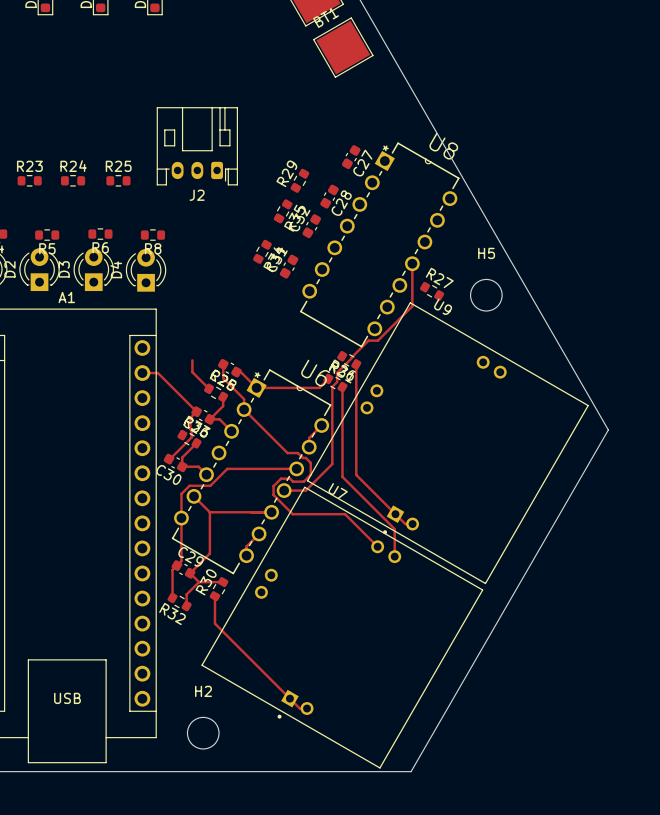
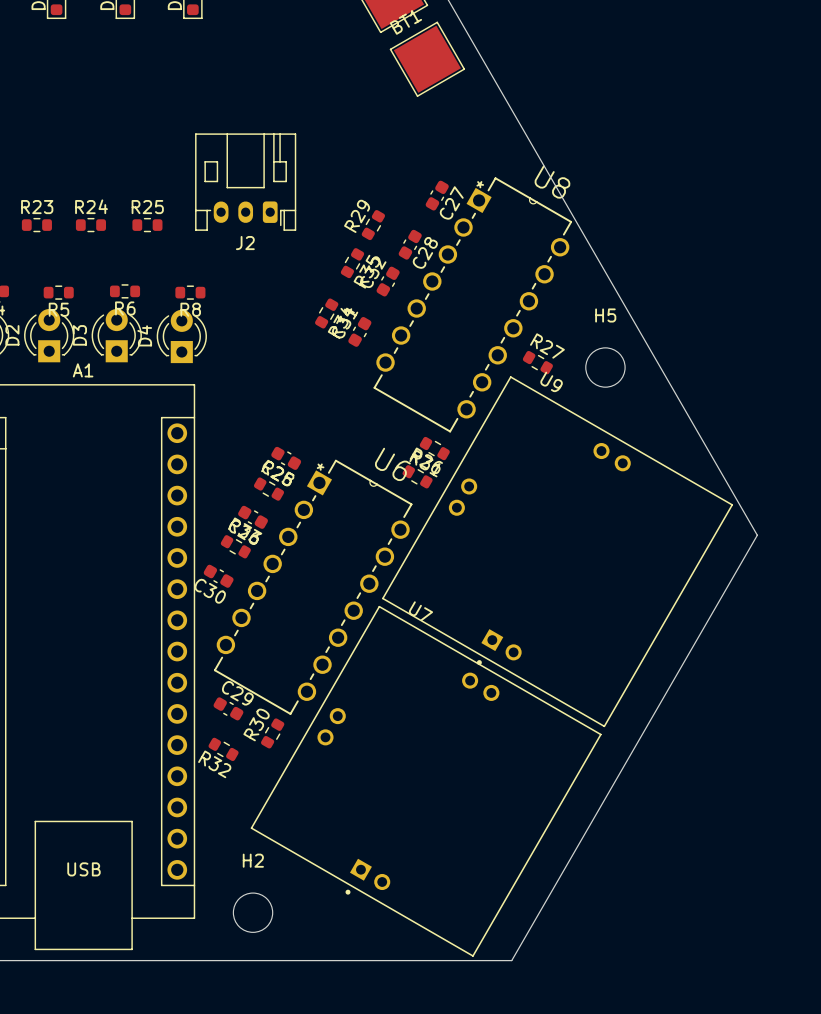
track: (412, 263) (412, 306) (377, 340) (368, 340) (337, 372) (337, 382) (332, 386) (332, 464) (305, 490) (284, 490) -> none
track: (192, 360) (192, 372) (209, 388) -> none
track: (223, 364) (223, 378) (244, 399) (244, 409) (287, 453) (297, 453) (310, 462) (310, 474) (303, 481) (281, 478) (273, 486) (273, 494) (292, 514) (345, 514) (377, 546) -> none
track: (356, 364) (356, 474) (405, 524) (412, 524) -> none
track: (236, 372) (240, 372) (256, 387) (319, 387) (328, 378) -> none
track: (142, 373) (157, 373) (196, 411) (190, 417) (191, 437) (169, 459) -> none
track: (342, 387) (342, 476) (394, 529) (394, 556) -> none
track: (223, 396) (223, 406) (209, 419) (219, 419) (231, 431) -> none
track: (321, 425) (309, 438) (309, 447) -> none
track: (196, 443) (182, 457) (182, 466) (198, 466) (206, 474) -> none
track: (296, 468) (227, 468) (210, 485) (189, 485) (181, 493) (181, 561) (172, 569) (172, 597) -> none
track: (193, 496) (209, 512) -> none
track: (209, 512) (271, 512) -> none
track: (209, 512) (209, 553) (190, 573) (199, 582) -> none
track: (259, 533) (246, 546) (246, 555) -> none
track: (199, 582) (186, 594) (186, 606) -> none
track: (199, 582) (223, 582) -> none
track: (214, 596) (214, 623) (299, 708) (307, 708) -> none

